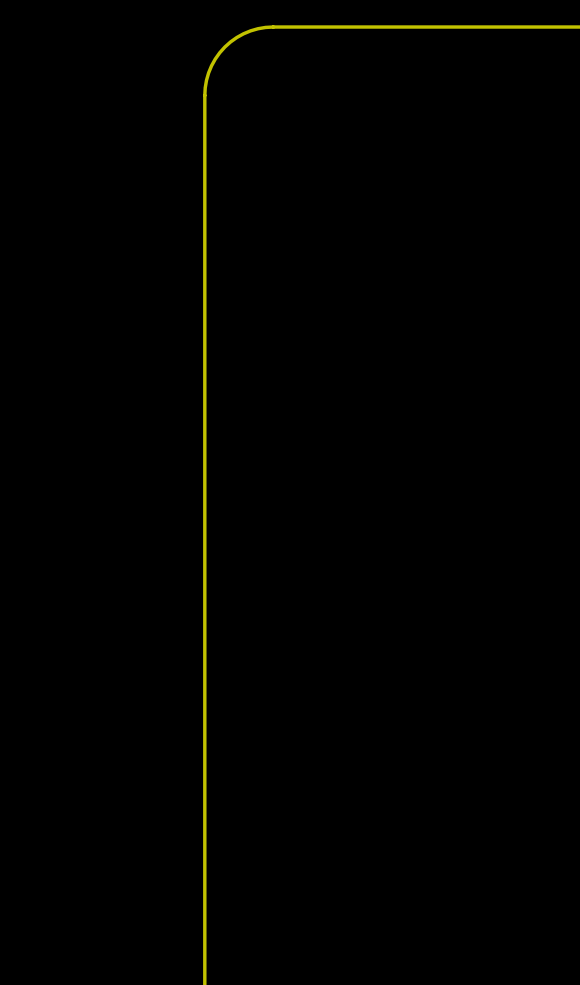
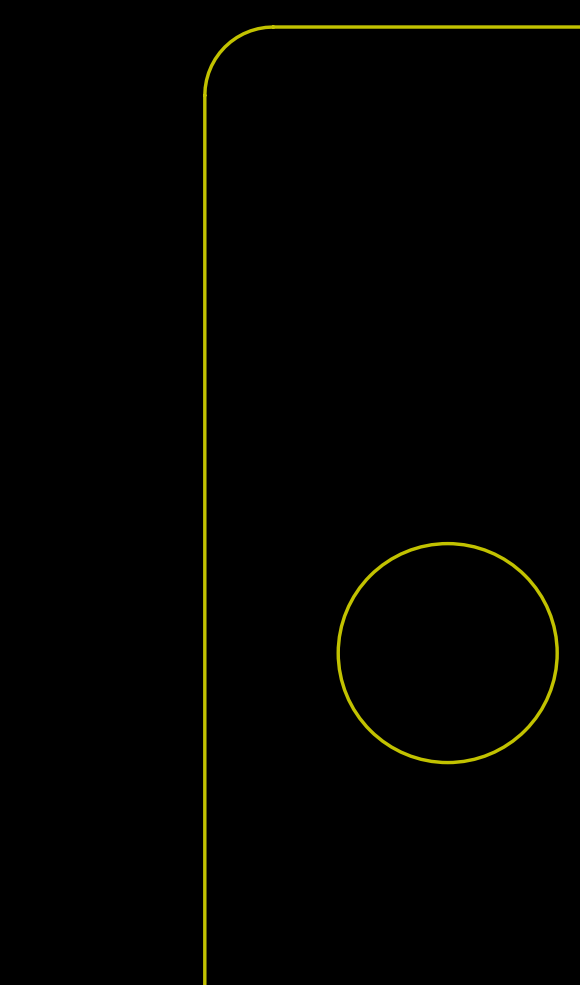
round board edge: none -> [336, 541, 559, 765]

